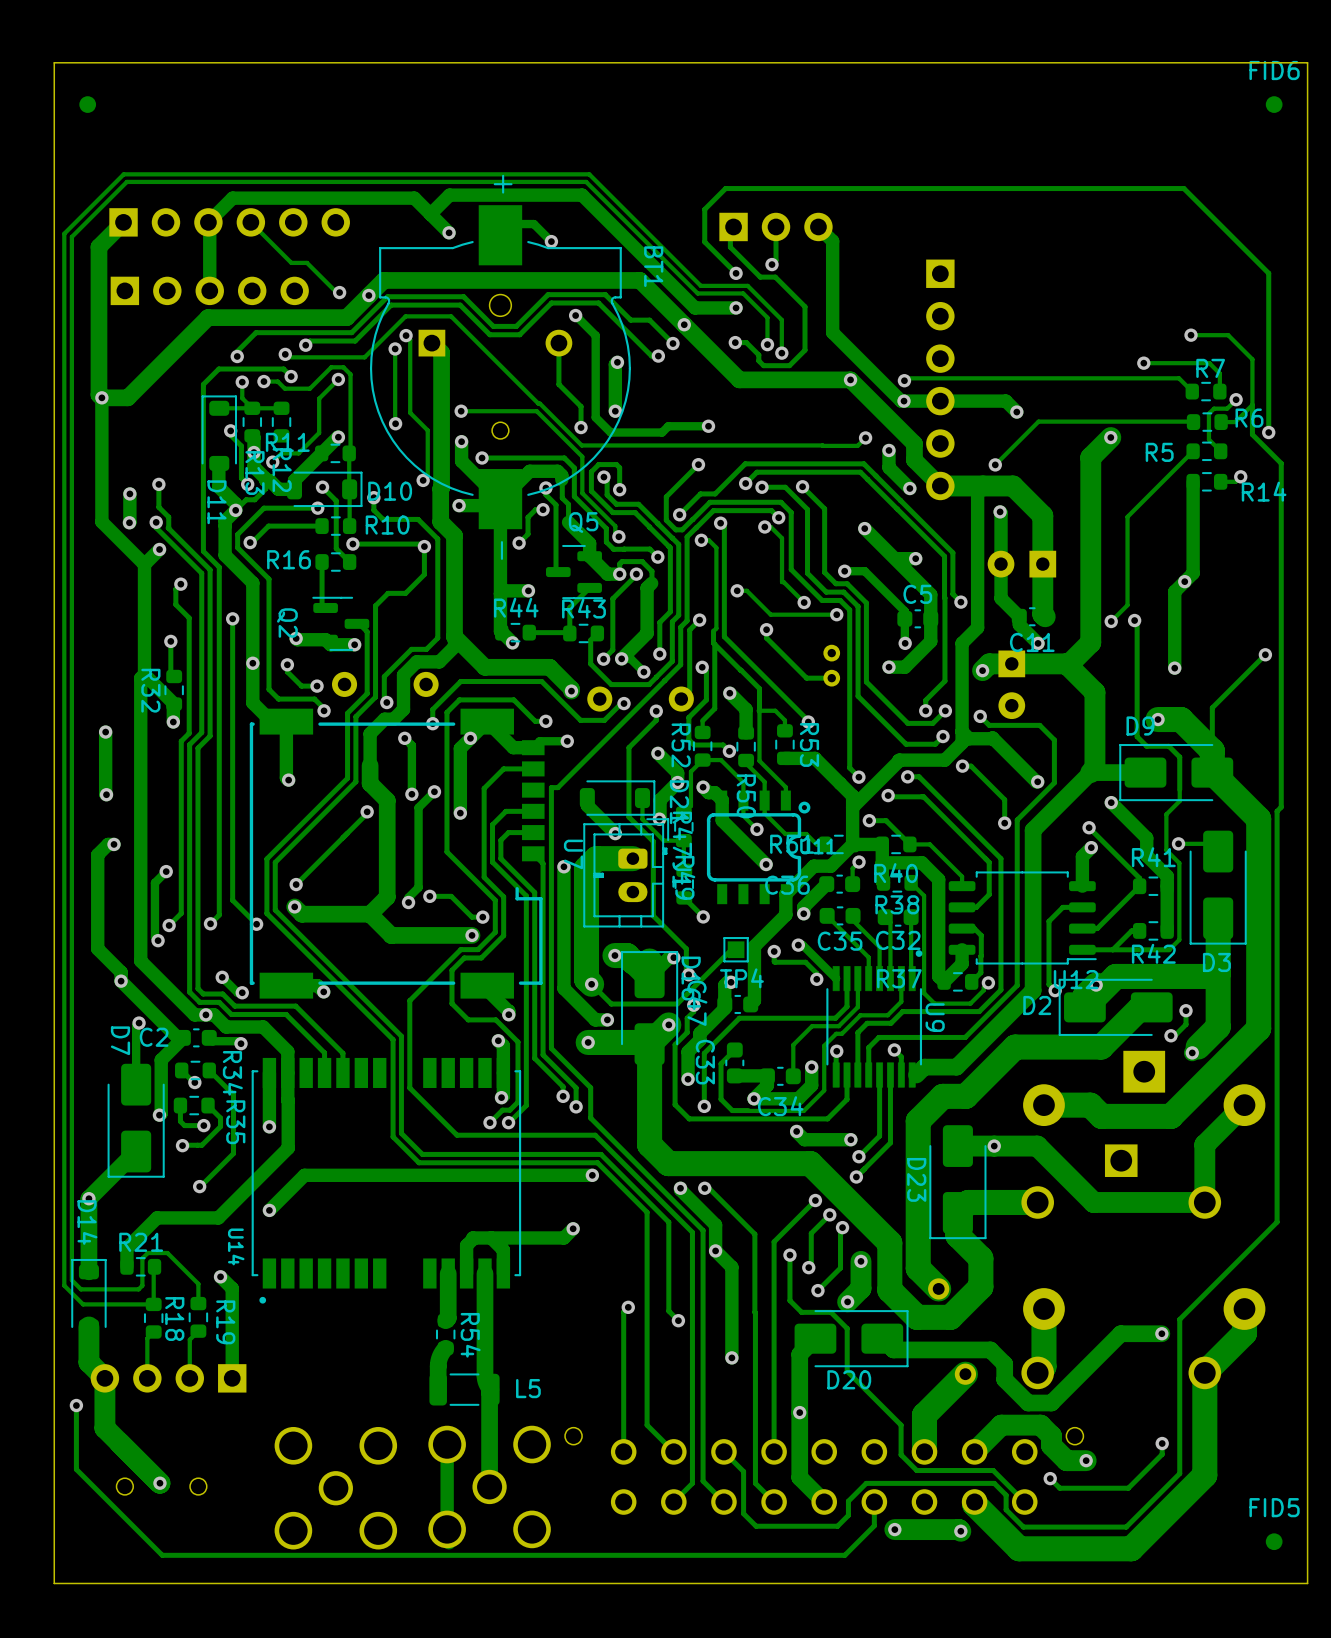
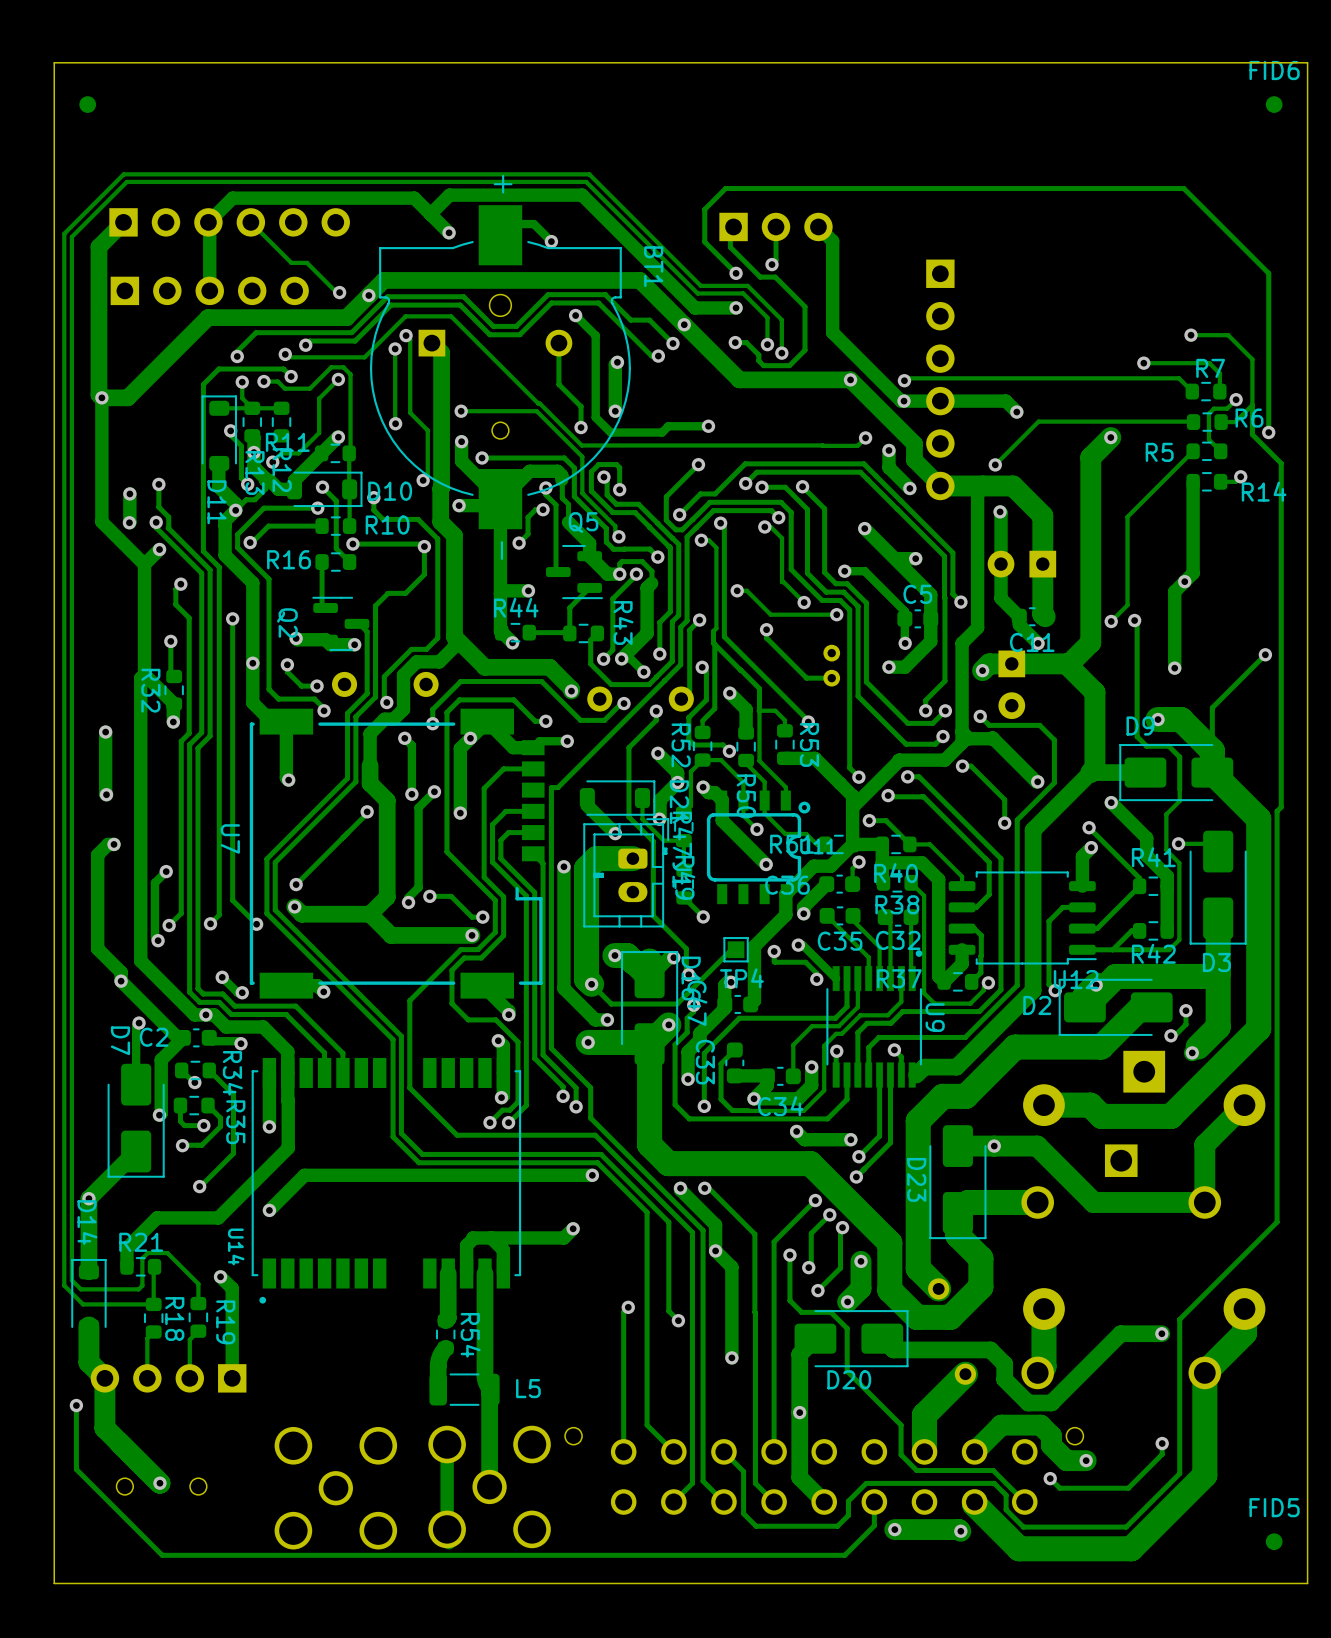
R43 name rotation: 0° (583, 608) -> 90° clockwise (623, 623)
U7 name position: U7 (573, 854) -> U7 (230, 838)

